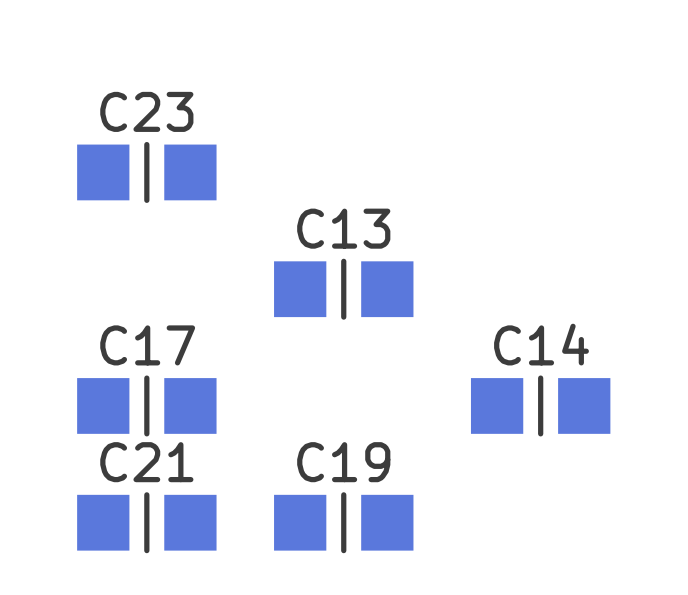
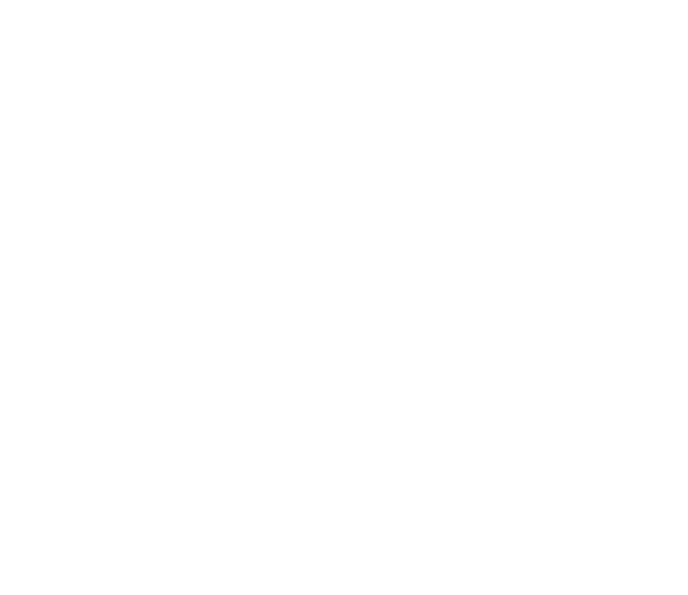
C23: (146, 172) -> none
C13: (343, 289) -> none
C17: (146, 405) -> none
C14: (540, 405) -> none
C21: (146, 522) -> none
C19: (343, 522) -> none

